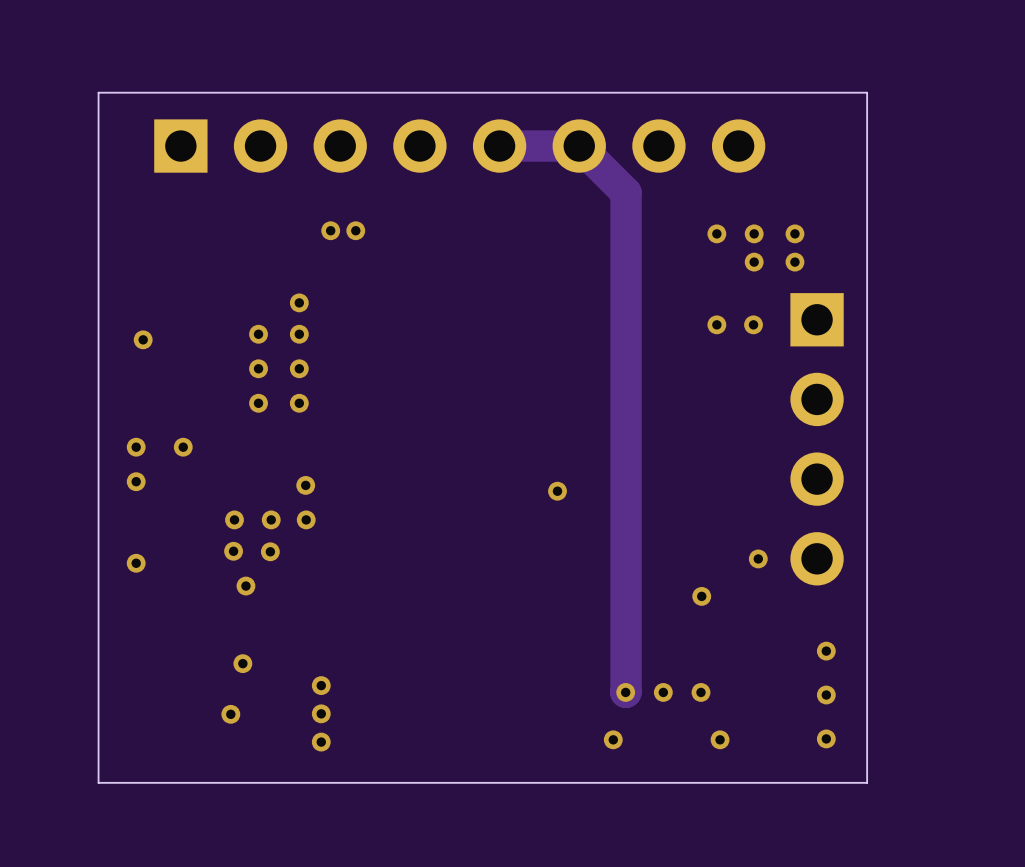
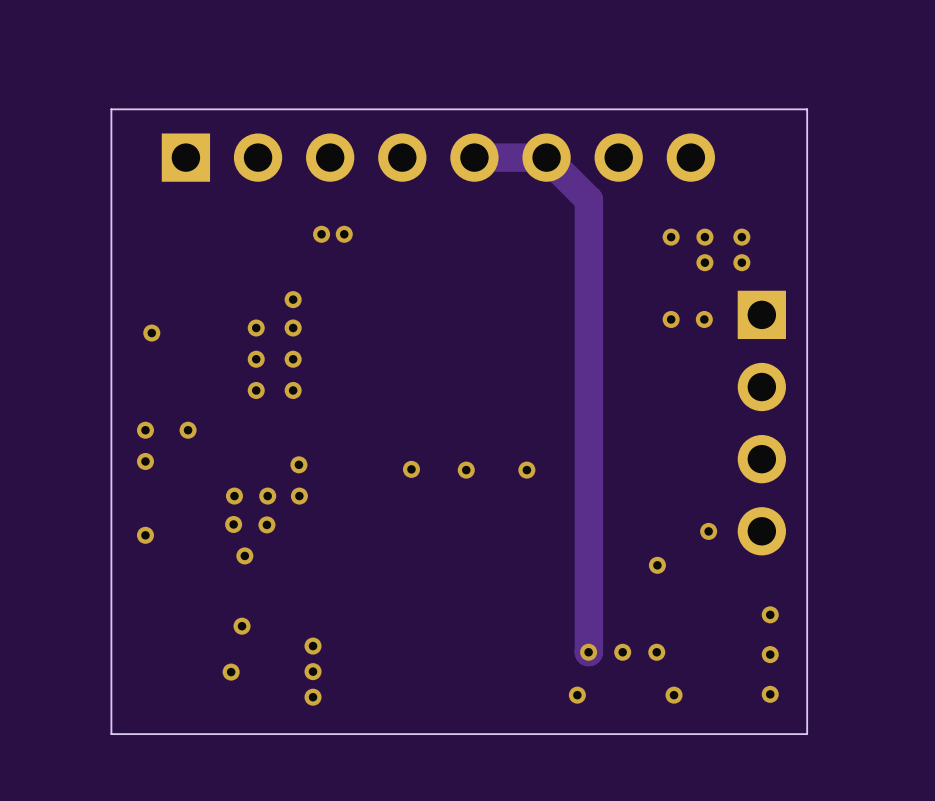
via: none -> (411, 469)
via: none -> (466, 470)

